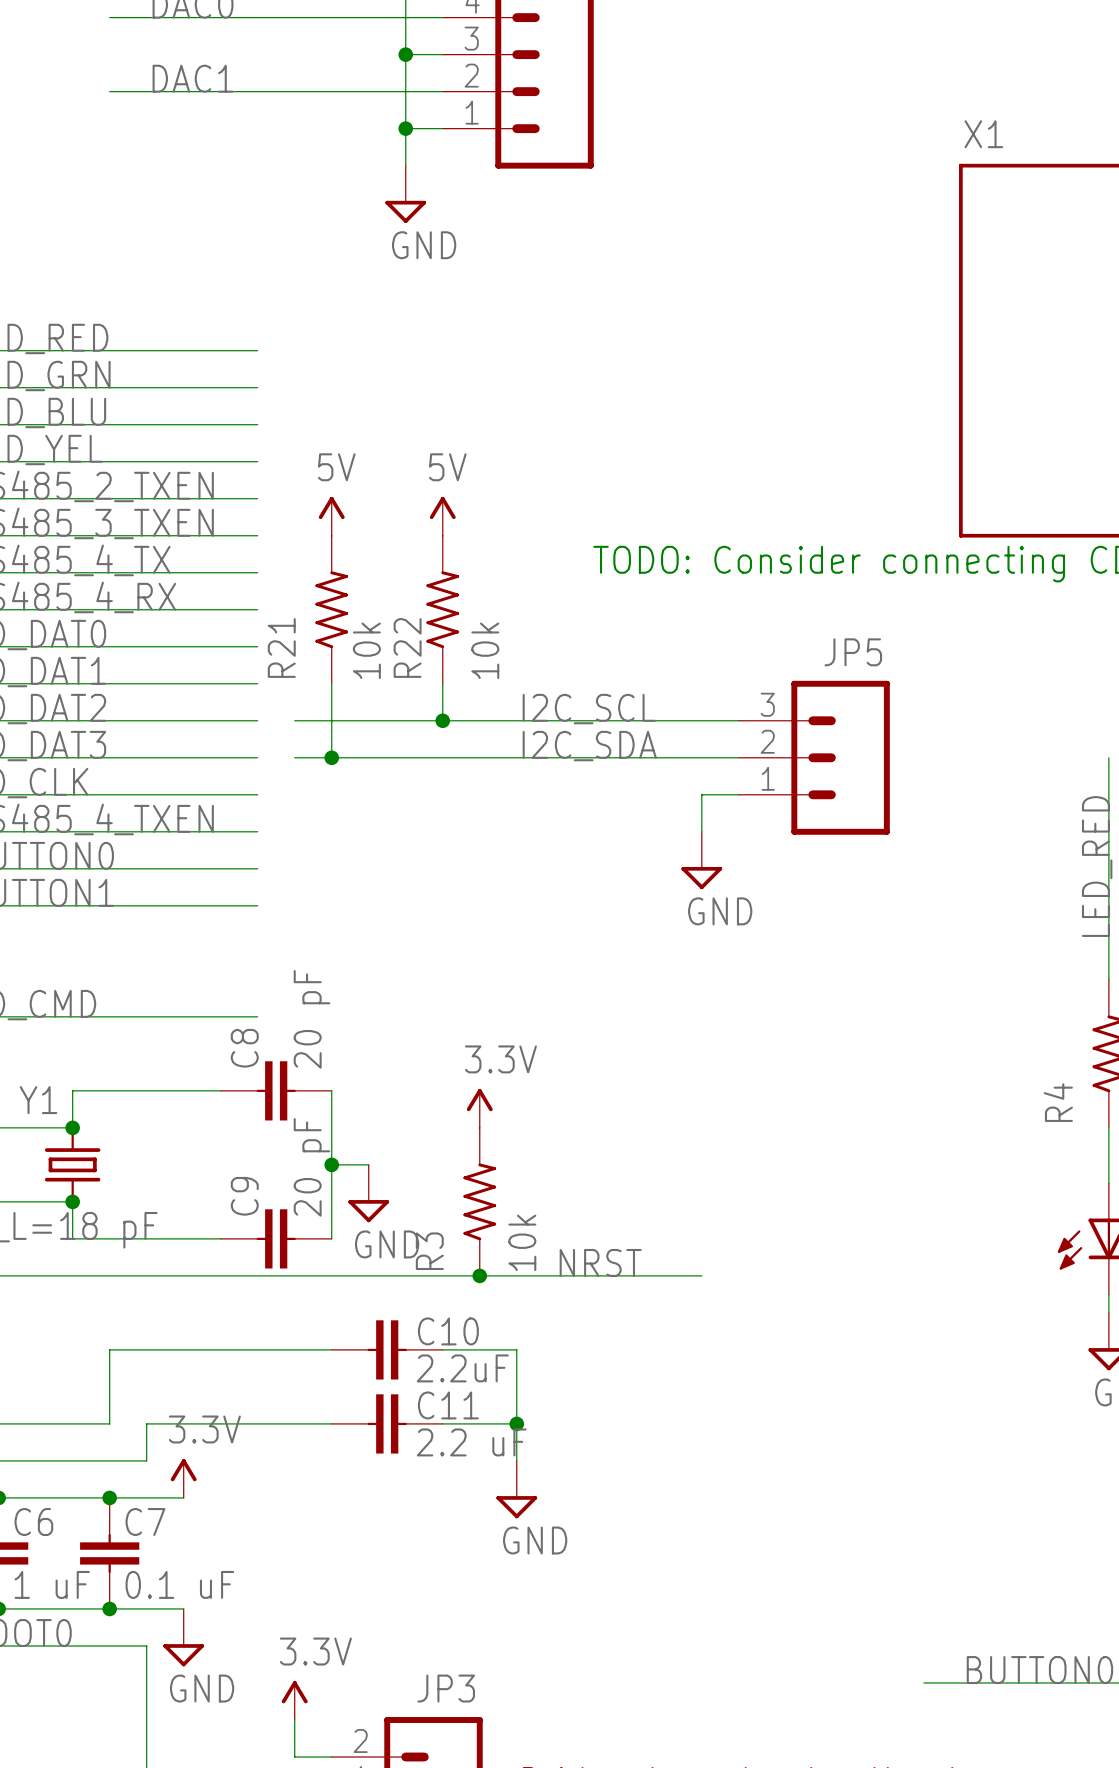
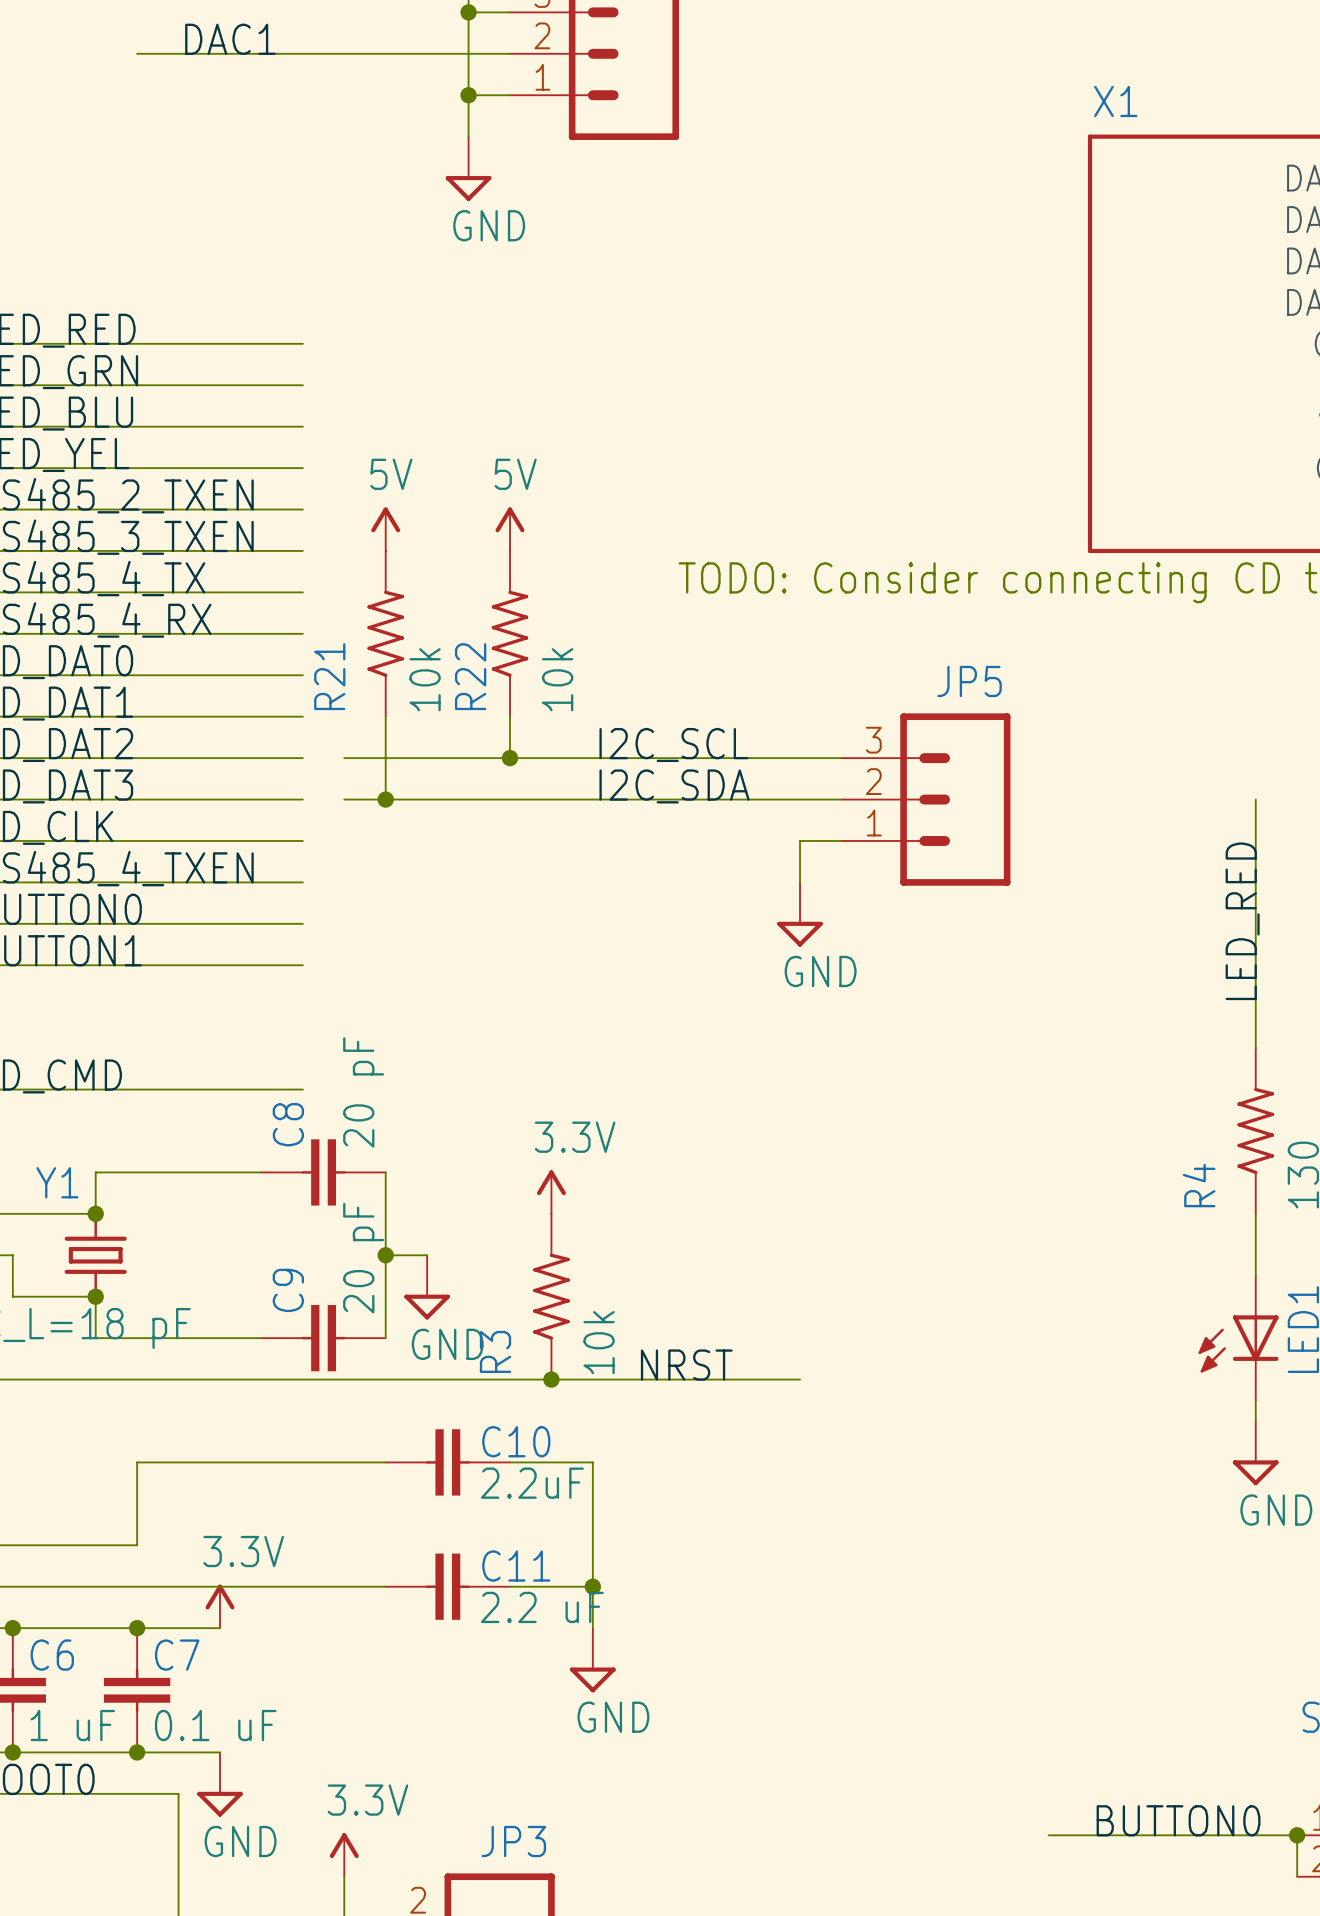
wire: (331, 1423) (146, 1423) (146, 1460) -> (385, 1586) (178, 1586)
C11 position: (387, 1423) -> (447, 1586)
wire: (442, 1423) (516, 1423) -> none
junction position: (516, 1423) -> (592, 1586)
wire: none -> (510, 1586) (592, 1586) (592, 1628)
power symbol position: GND (516, 1489) -> GND (592, 1660)

